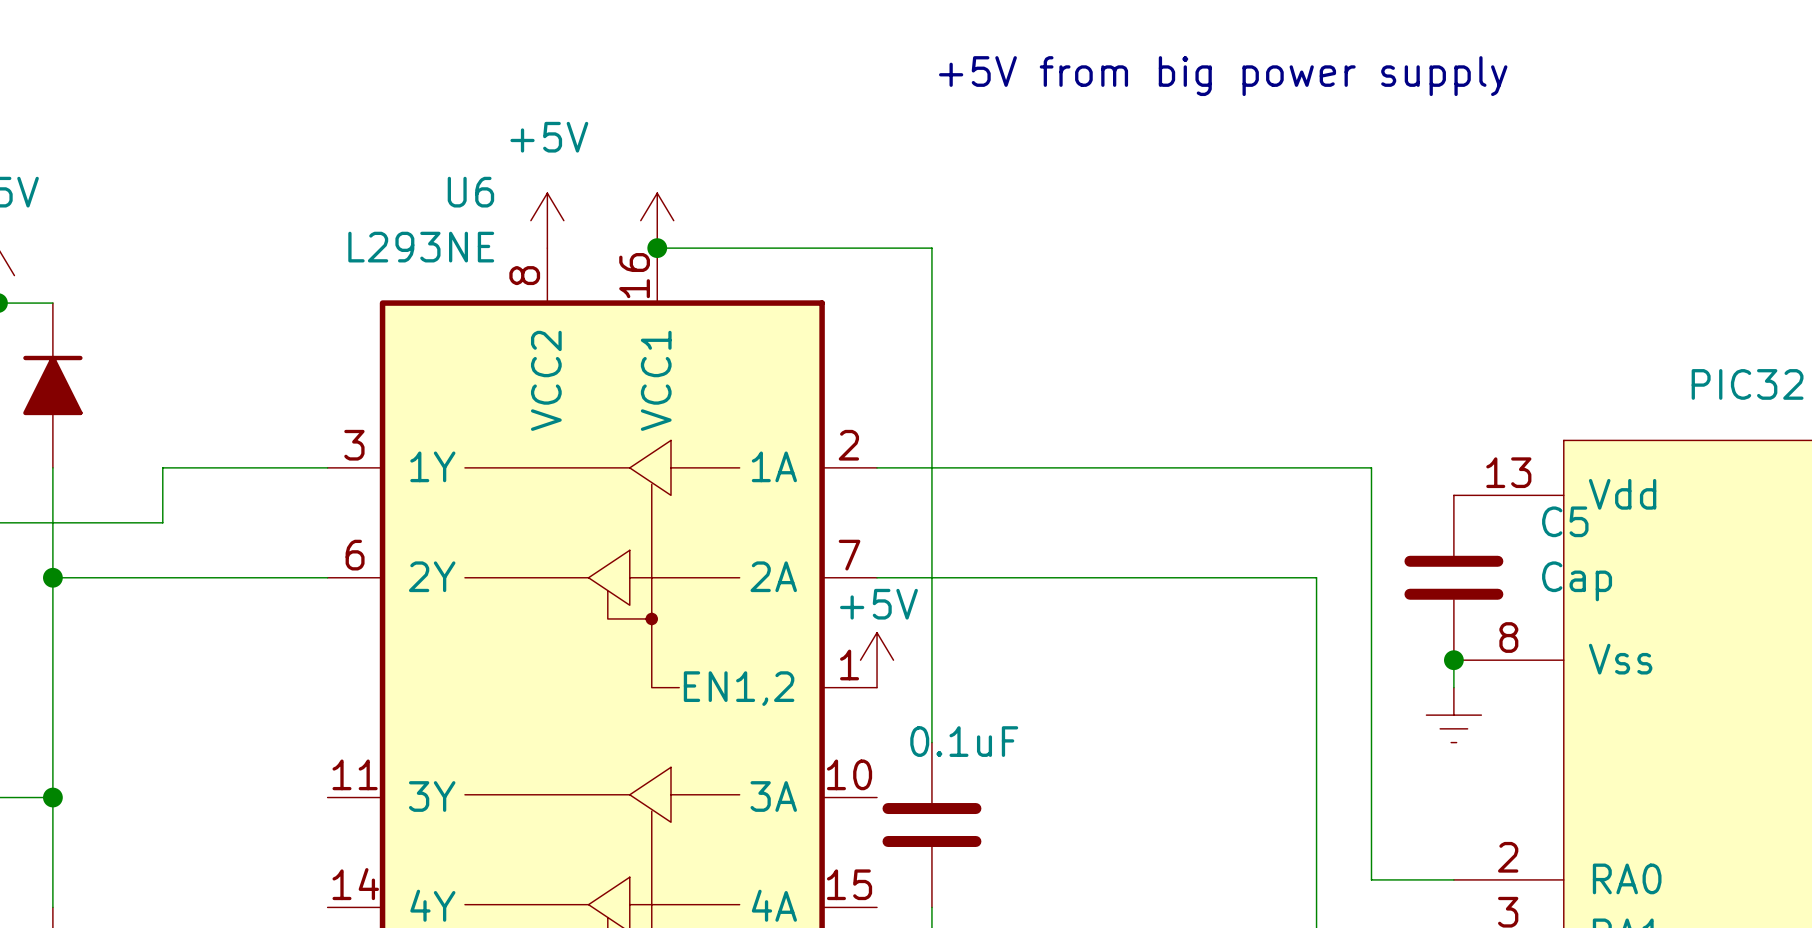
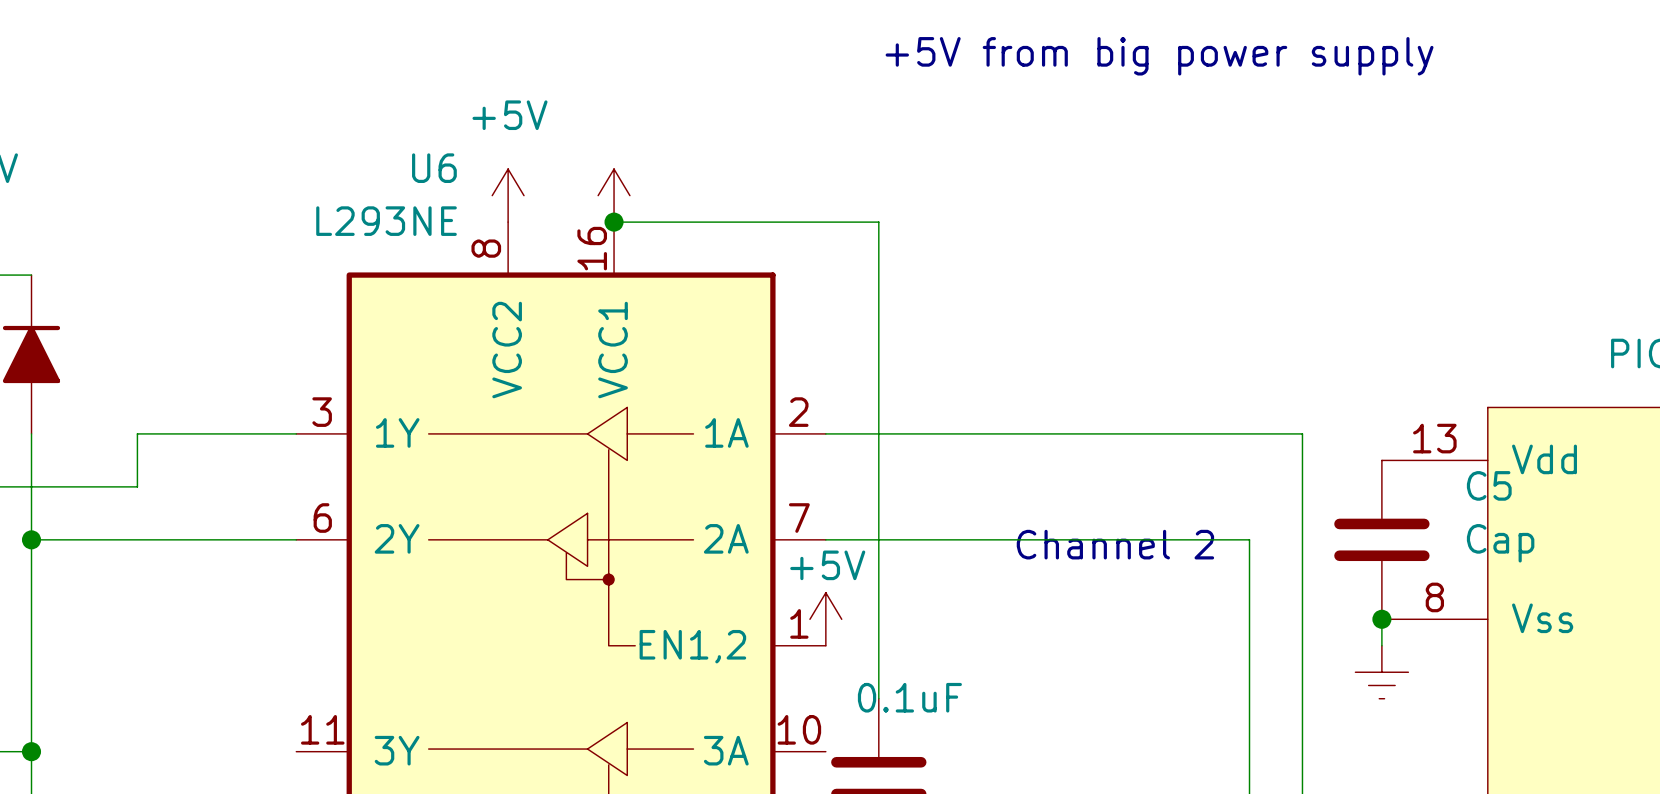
text: none -> Channel 2 (1115, 544)

